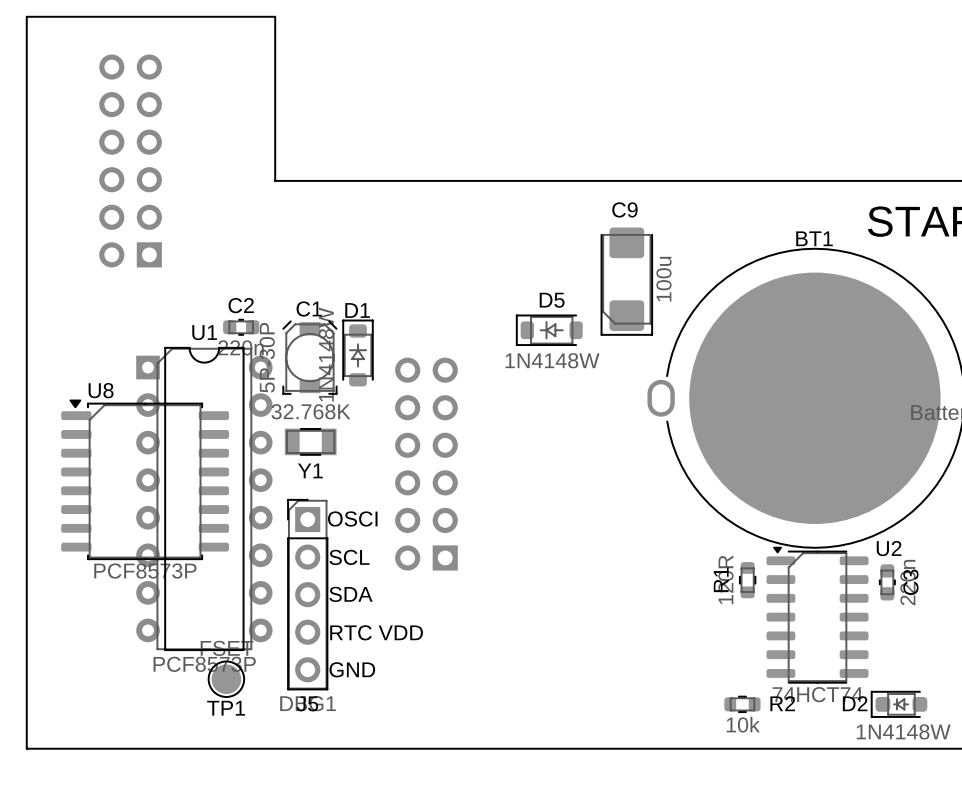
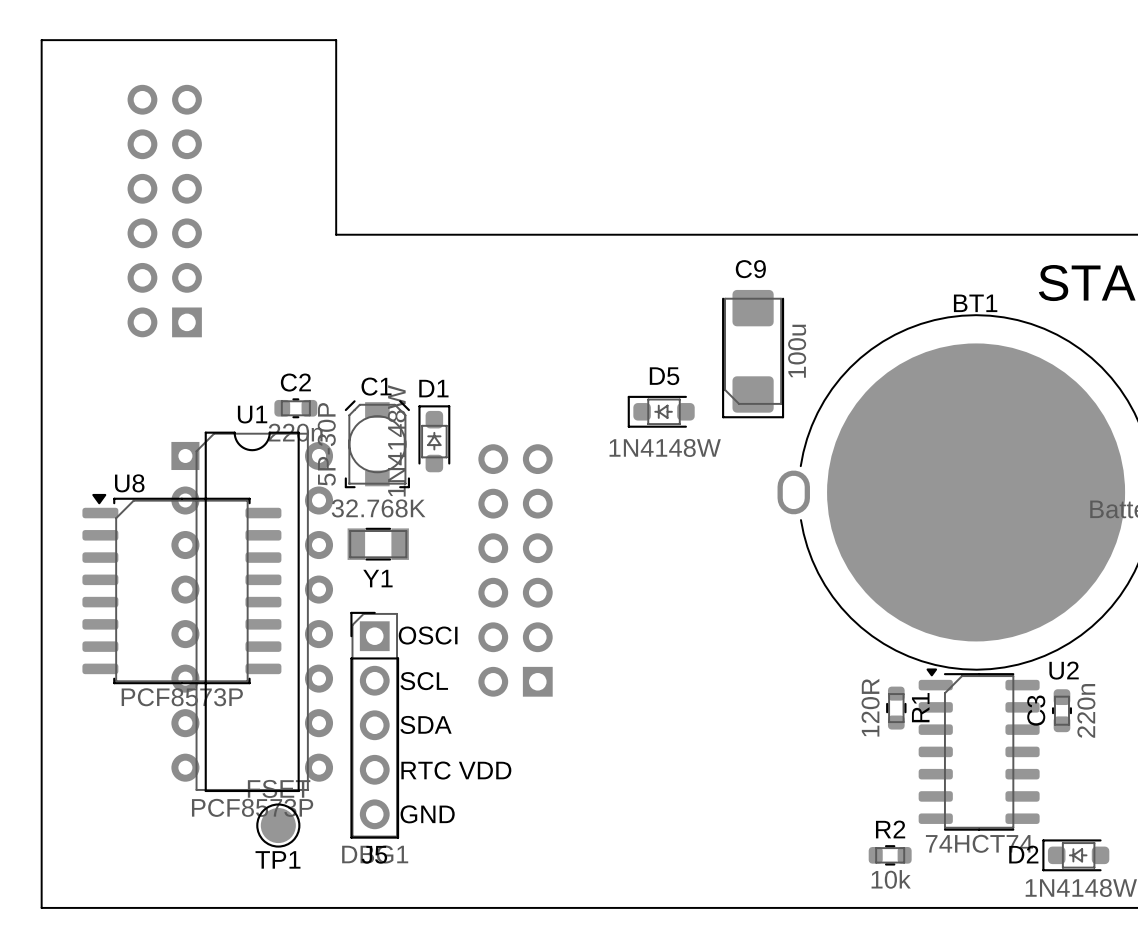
D5 footprint: [515, 314, 583, 346] -> [627, 395, 695, 428]
D1 footprint: [342, 319, 374, 387] -> [418, 405, 451, 473]
R1 name position: R1 (721, 579) -> R1 (920, 707)
C3 name position: C3 (910, 582) -> C3 (1036, 710)
R2 name position: R2 (782, 703) -> R2 (890, 829)

